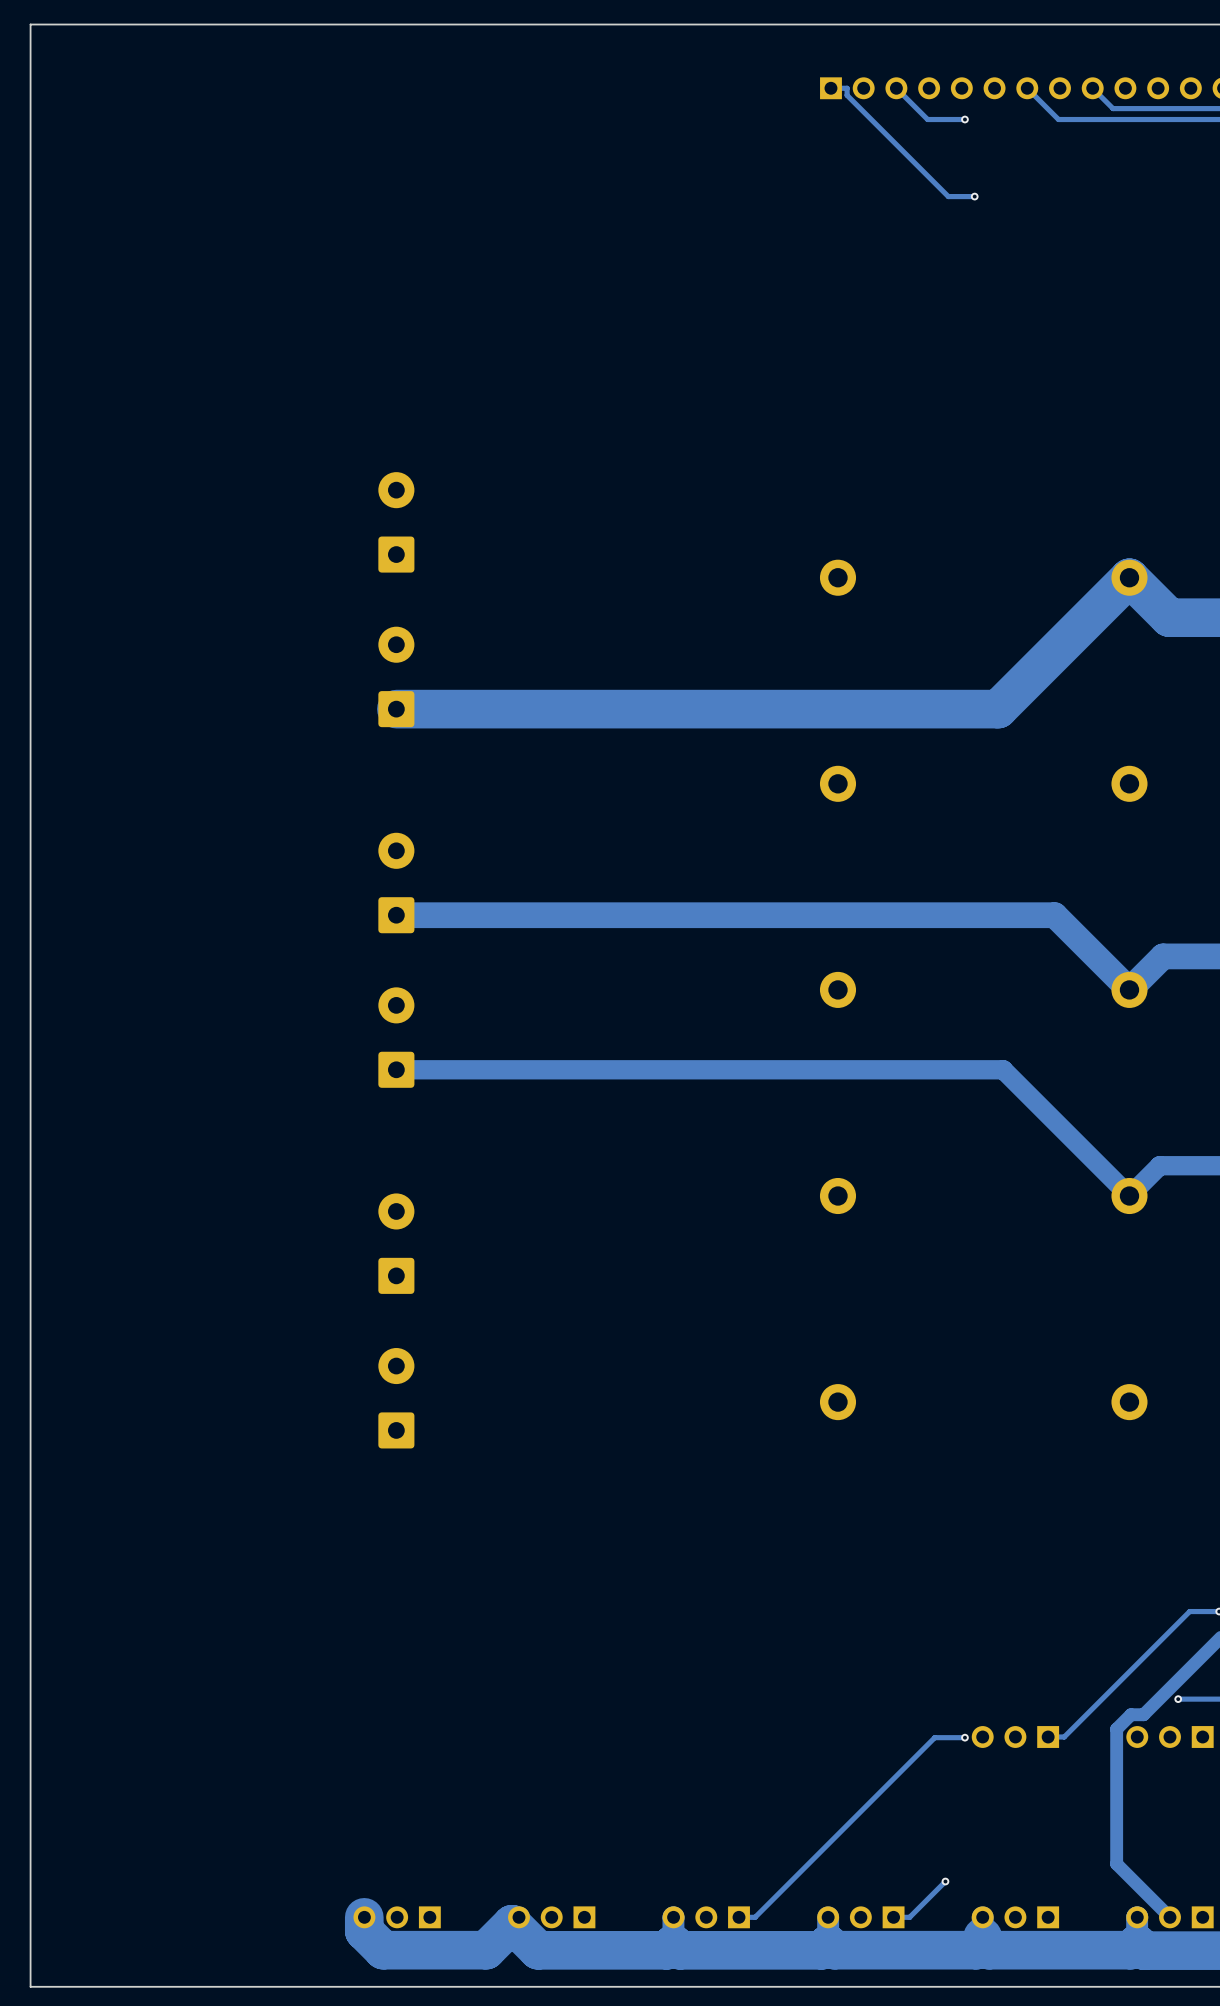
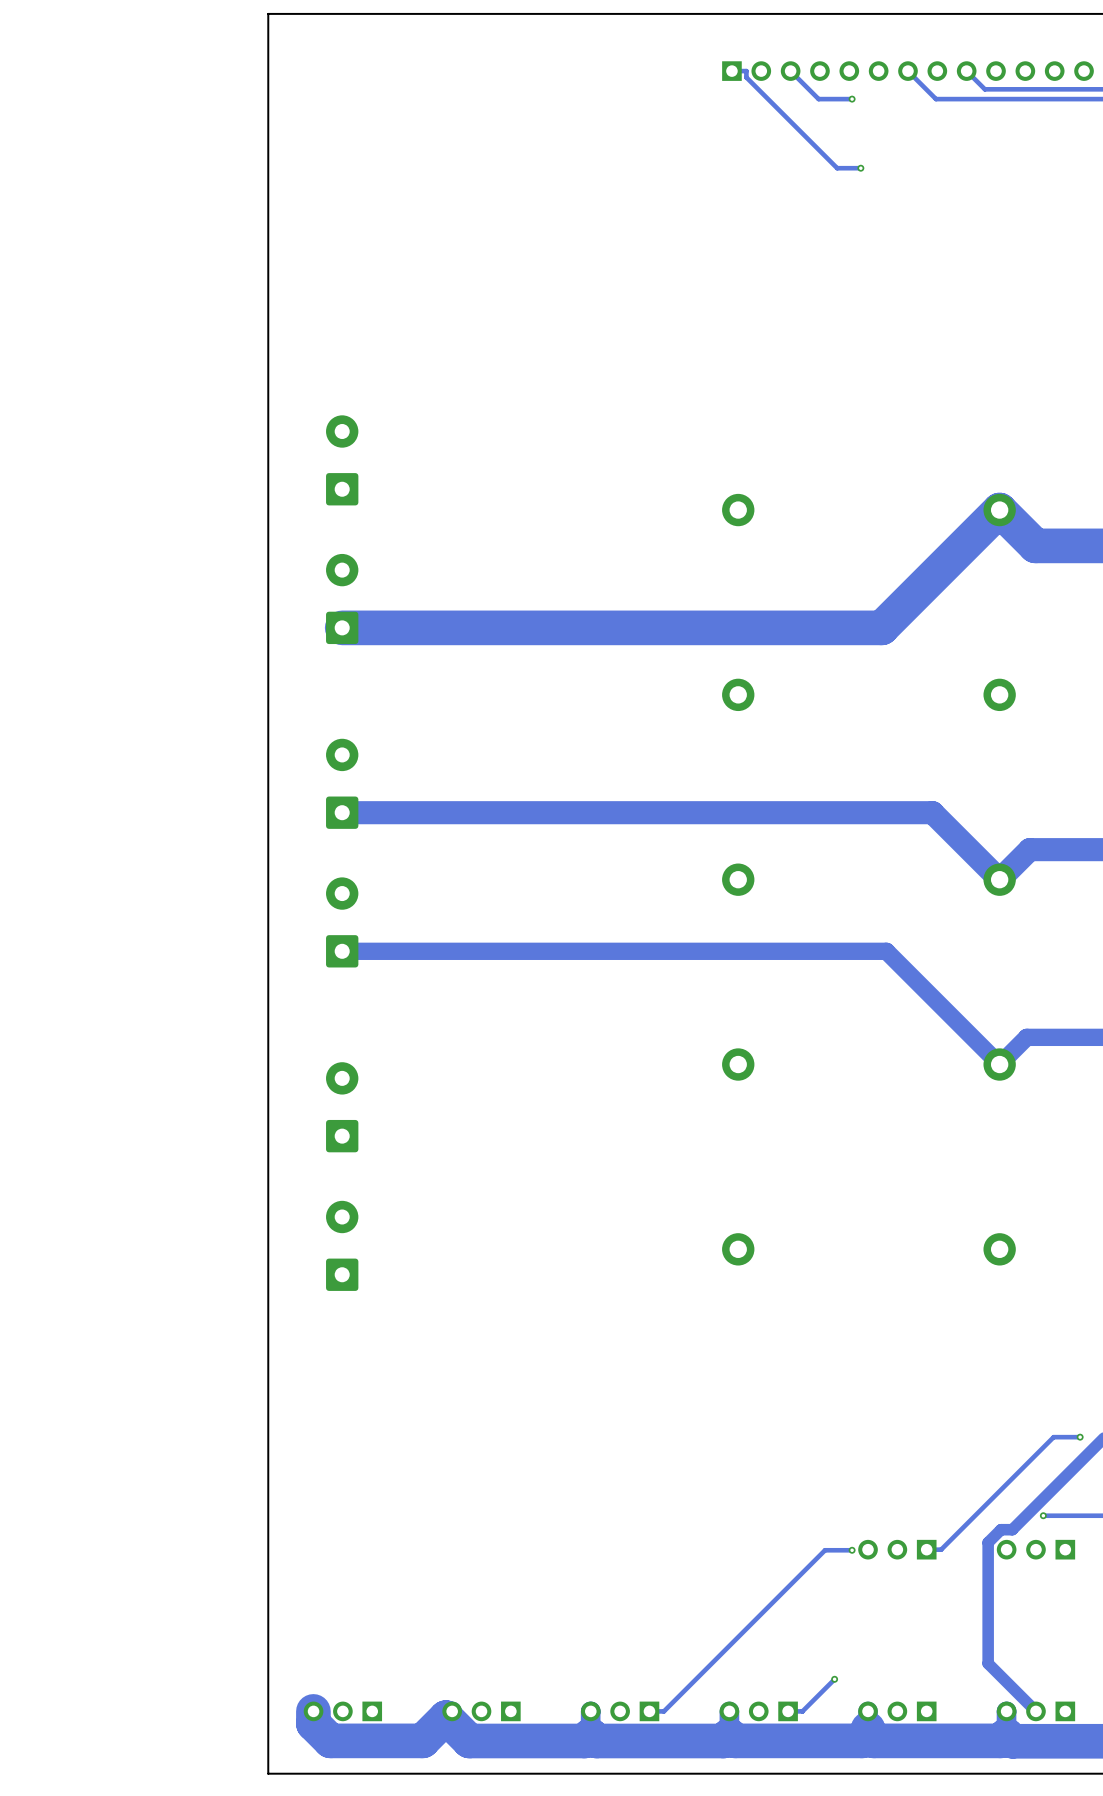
board edge: (313, 24) (30, 24) (30, 1986) (313, 1986) -> (268, 13) (268, 1773)

